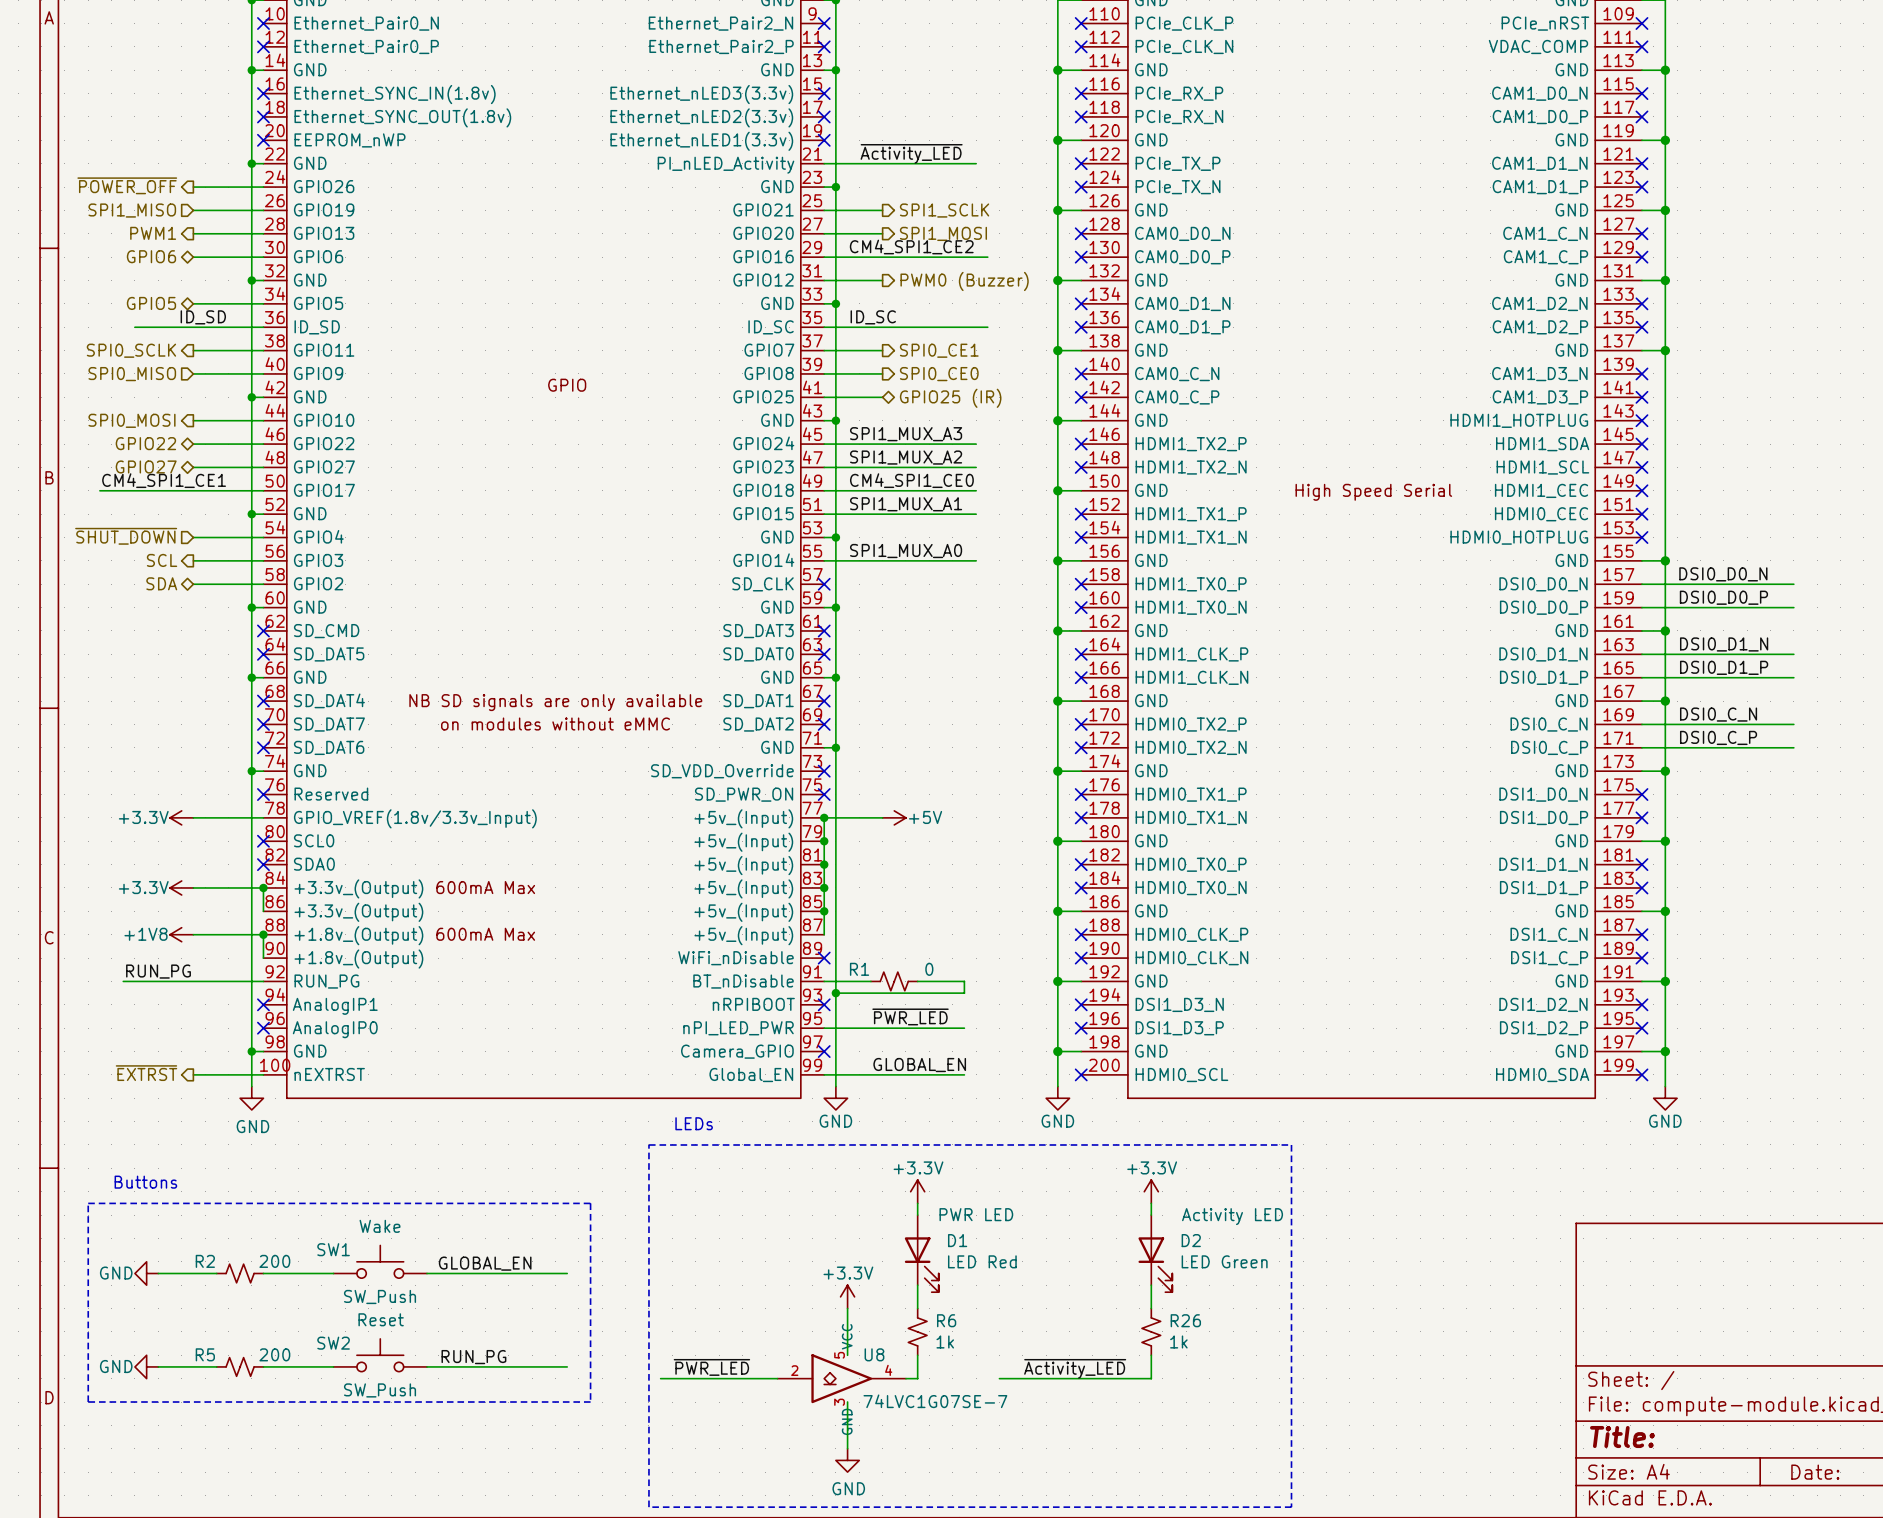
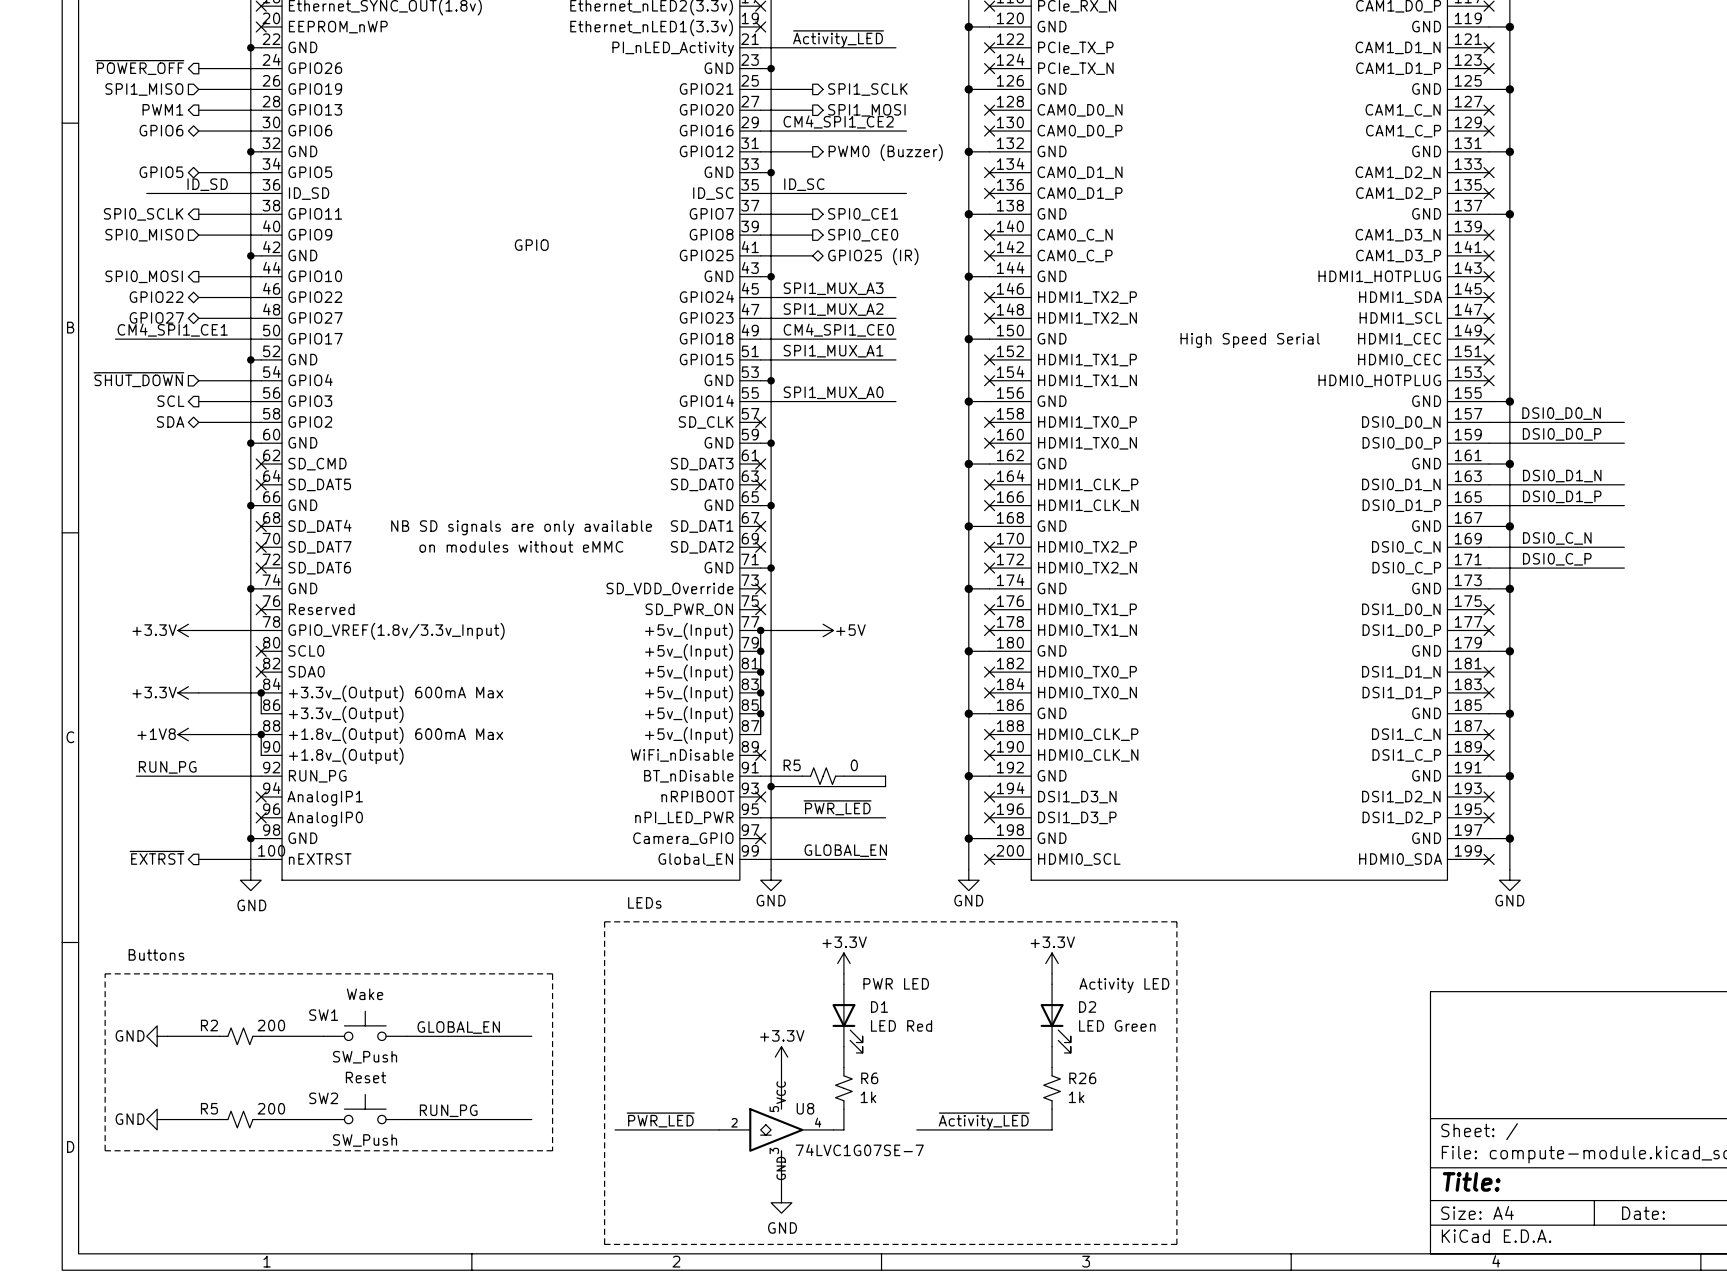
R1 name: R1 (859, 969) -> R5 (792, 765)

